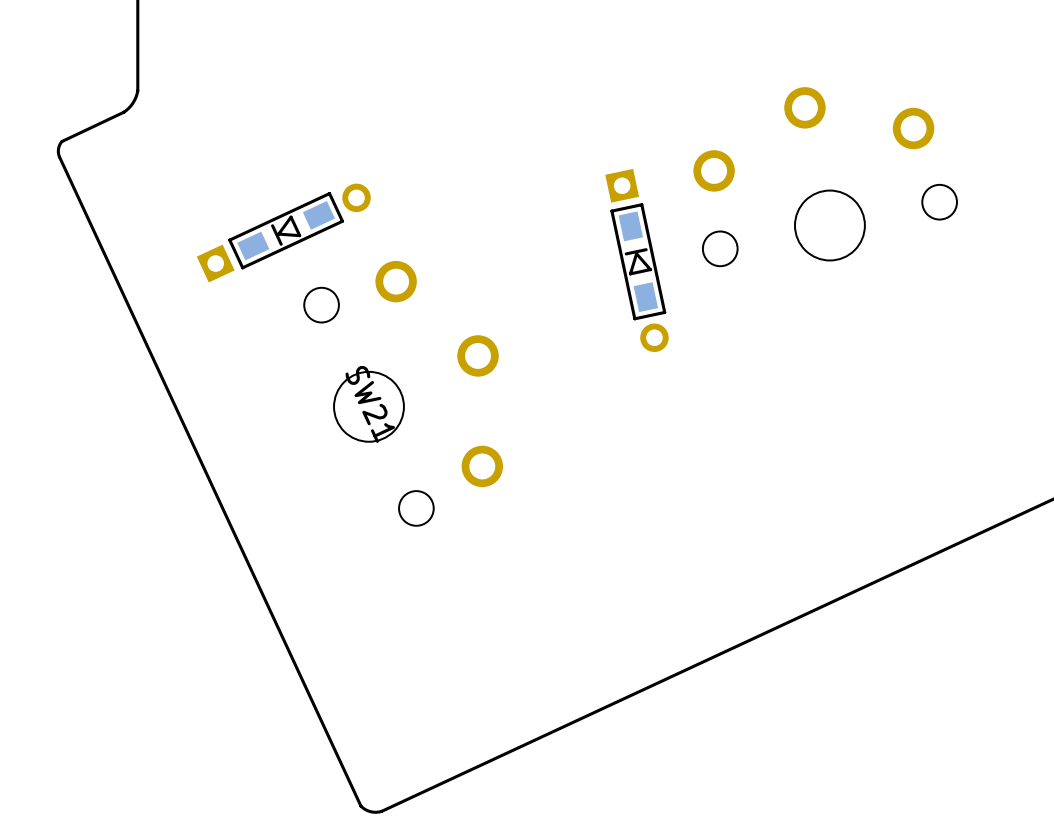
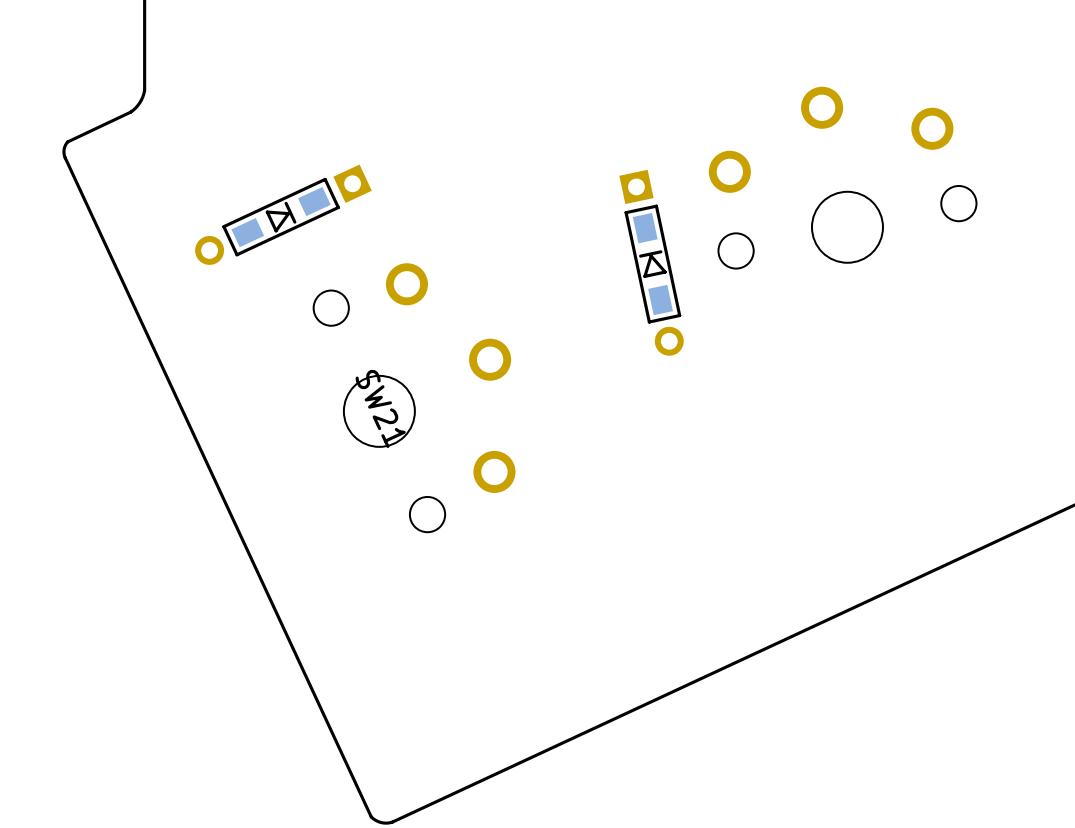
part rotation: 0° (283, 233) -> 180° (283, 214)

